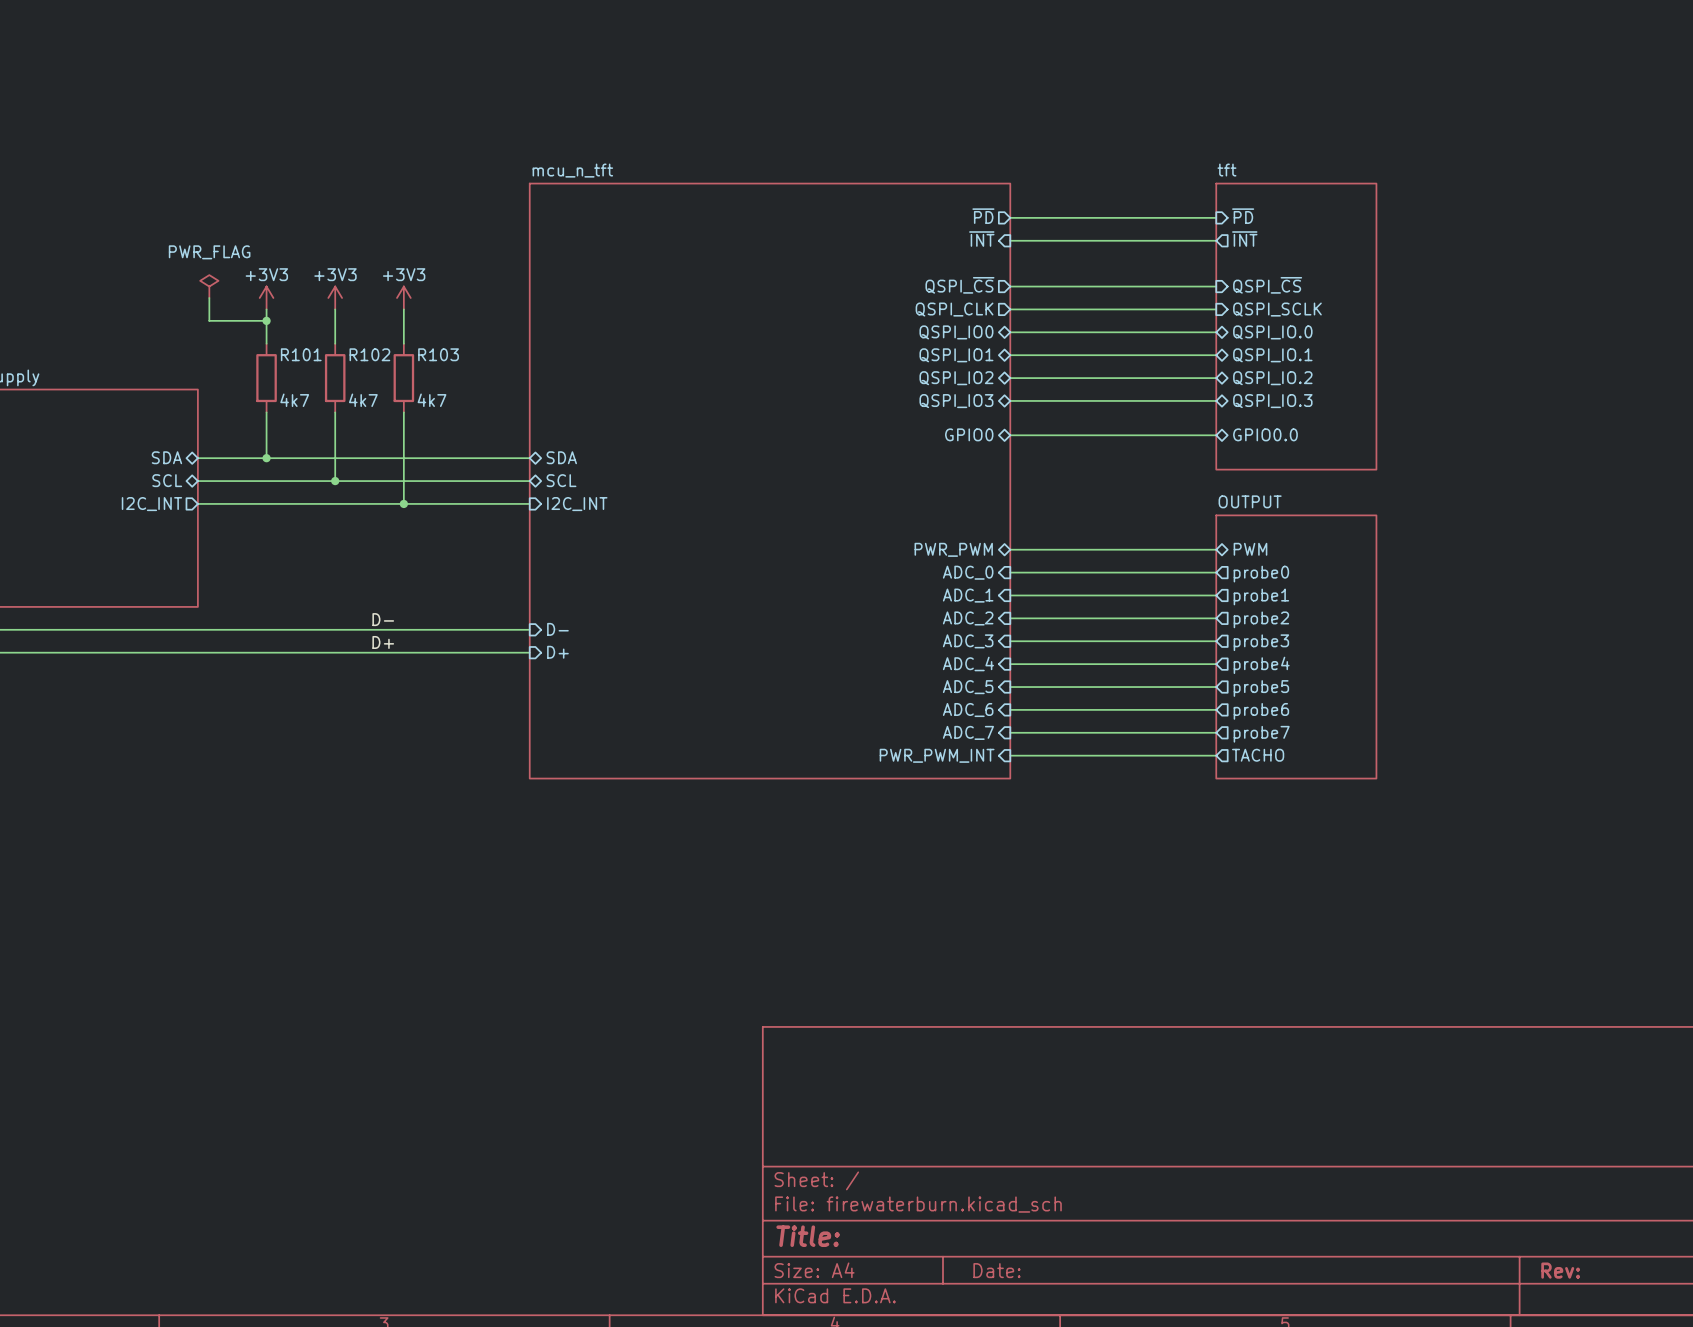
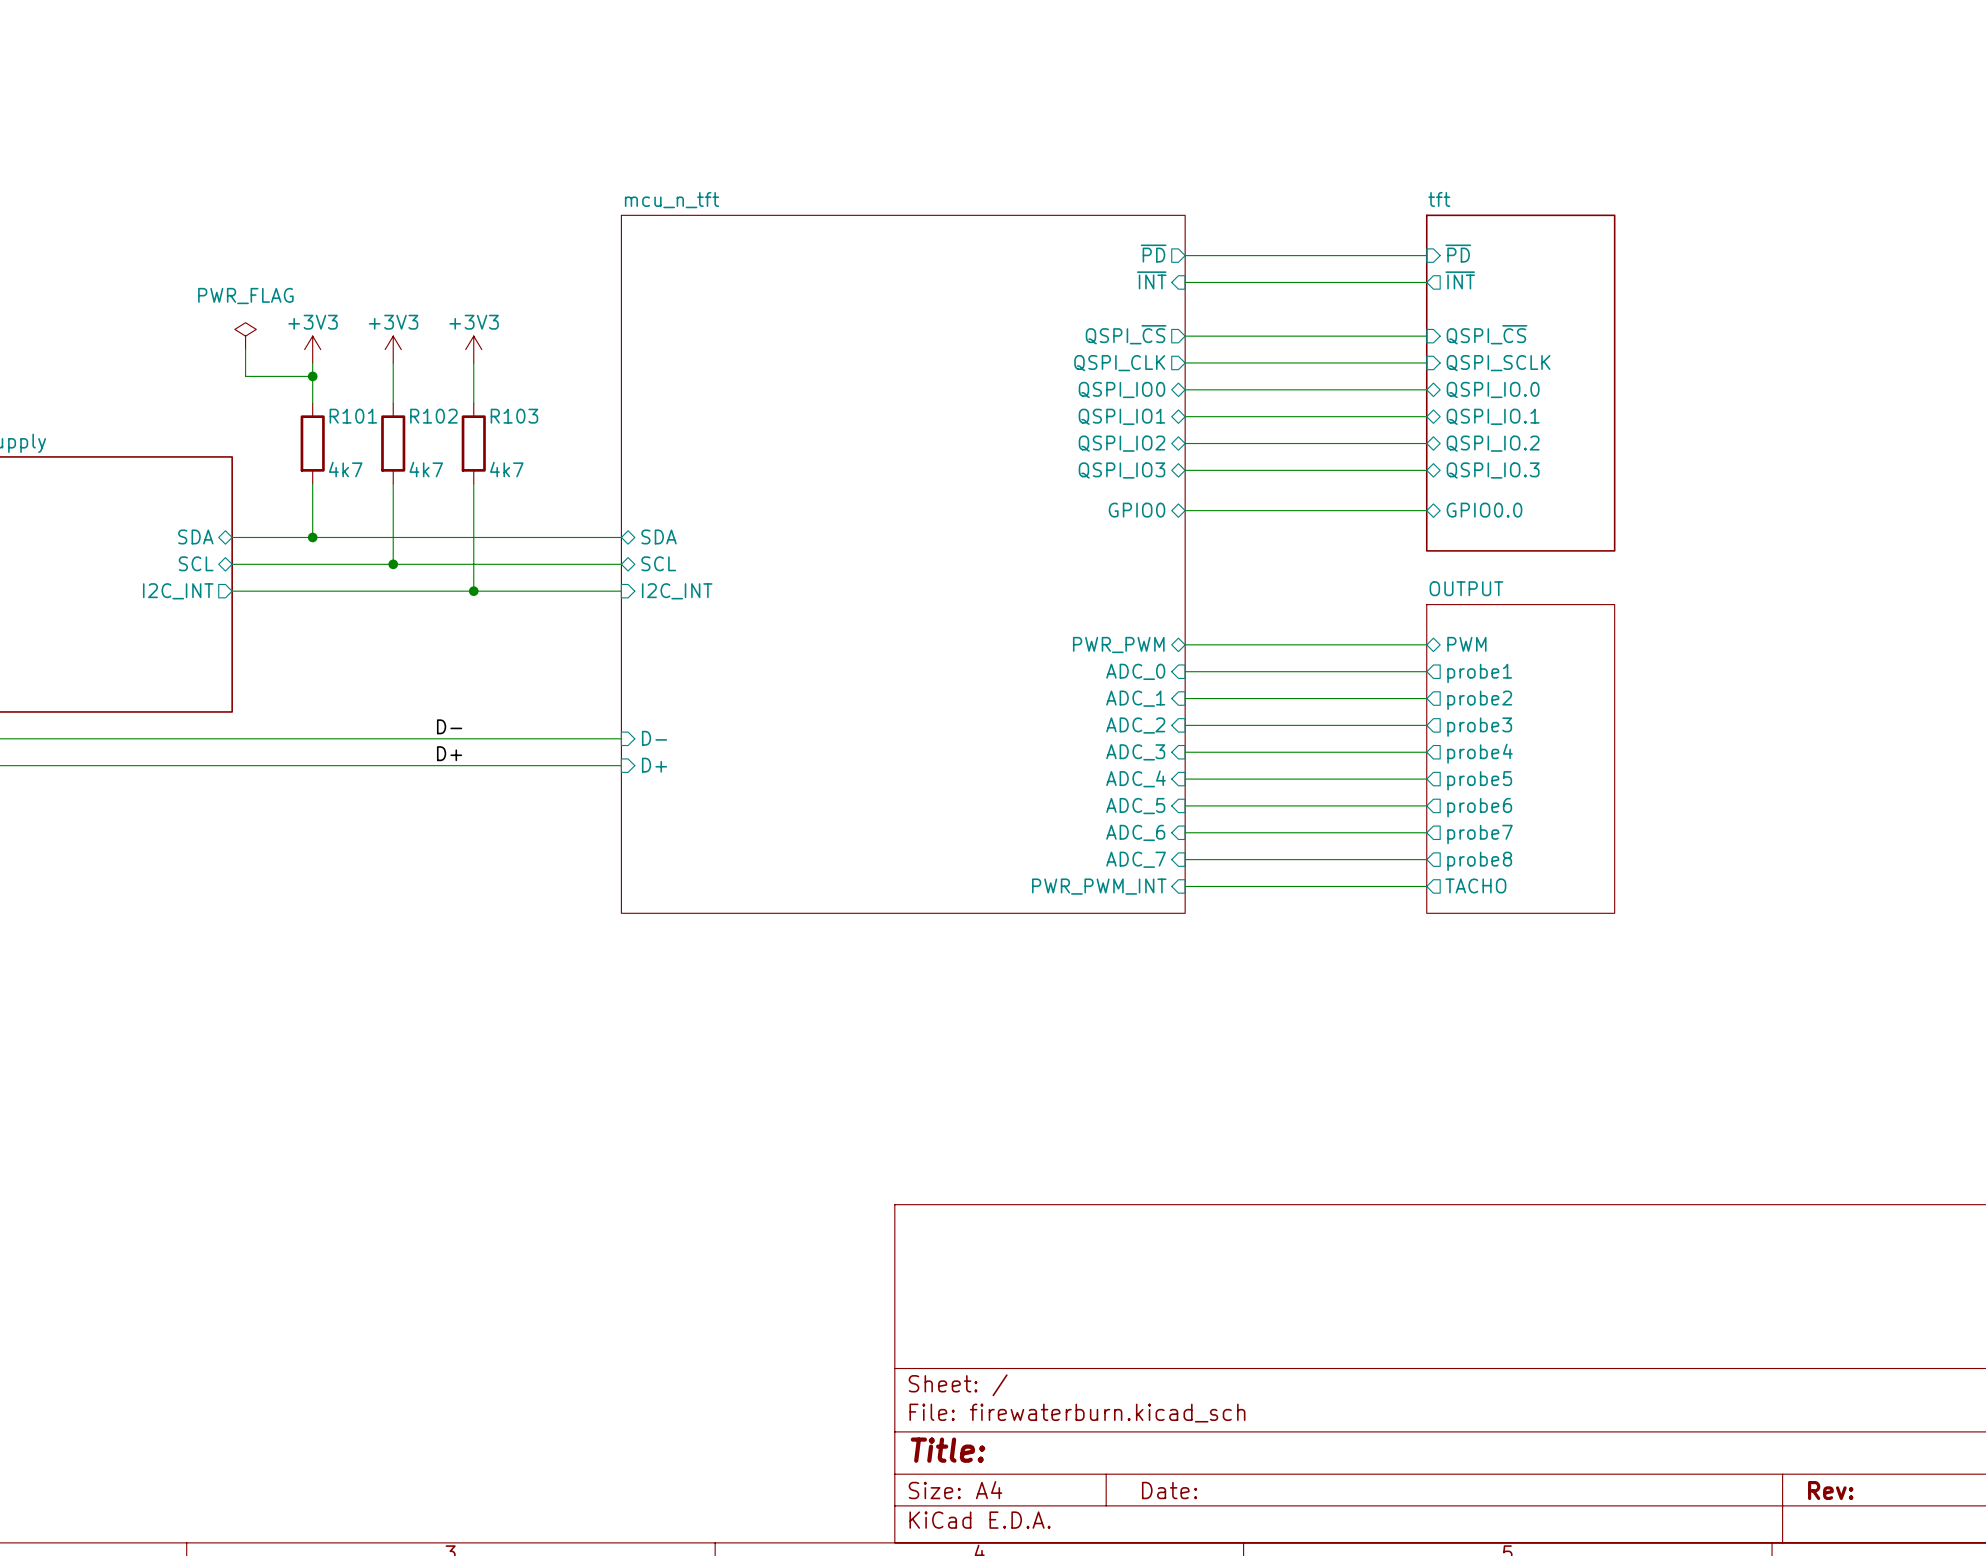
sheet pin: probe0 (1261, 574) -> probe1 (1479, 673)
sheet pin: probe1 (1261, 596) -> probe2 (1479, 700)
sheet pin: probe2 (1261, 619) -> probe3 (1479, 727)
sheet pin: probe3 (1261, 642) -> probe4 (1480, 753)
sheet pin: probe4 (1261, 665) -> probe5 (1479, 780)
sheet pin: probe5 (1261, 688) -> probe6 (1479, 807)
sheet pin: probe6 (1261, 711) -> probe7 (1480, 834)
sheet pin: probe7 (1261, 734) -> probe8 (1479, 861)

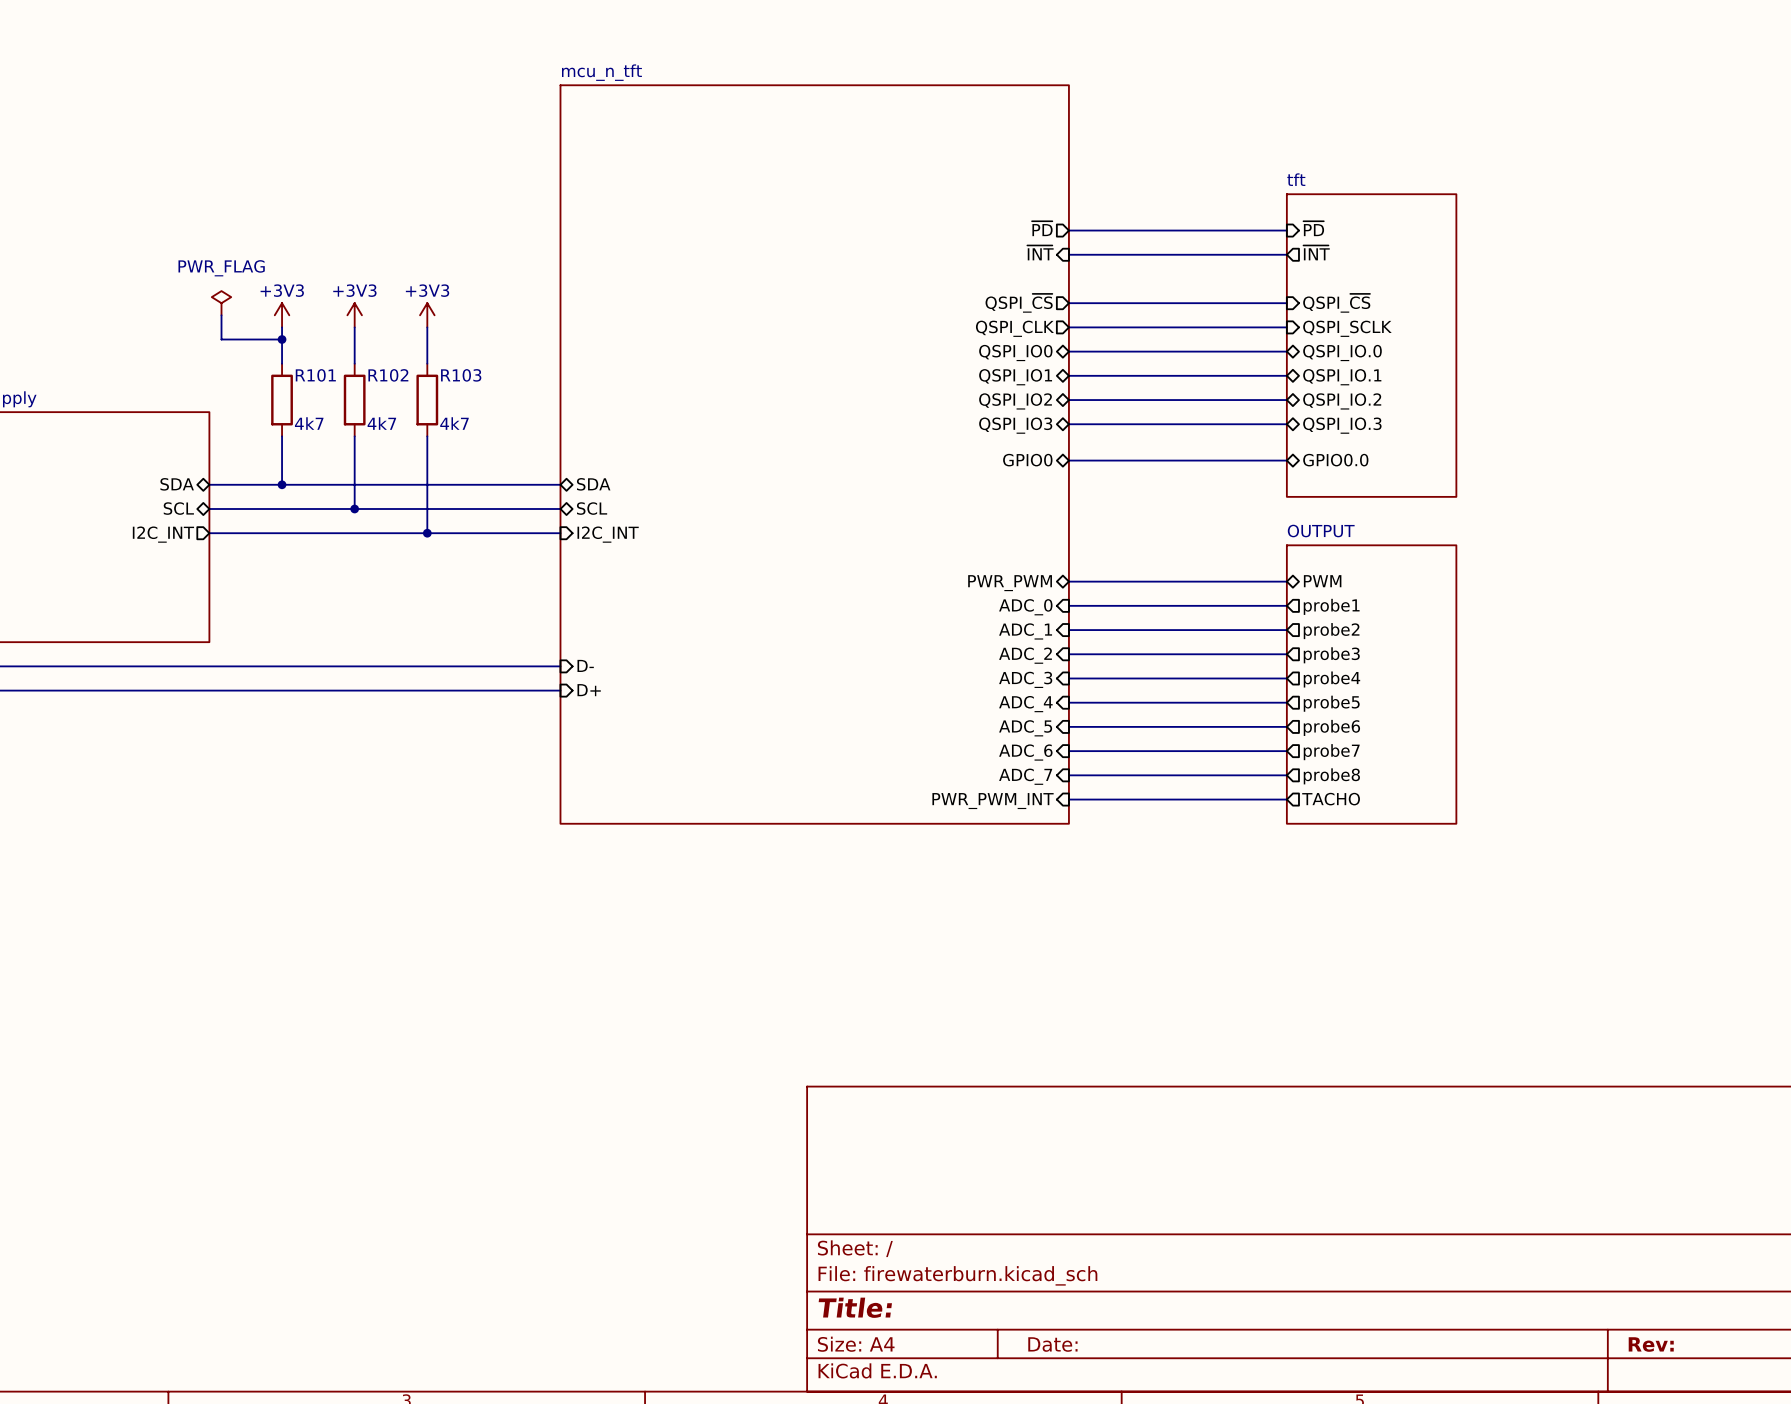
sheet mcu_n_tft: none -> (814, 454)
sheet mcu_n_tft: (903, 564) -> none
label: D- (449, 726) -> none
label: D+ (449, 753) -> none

